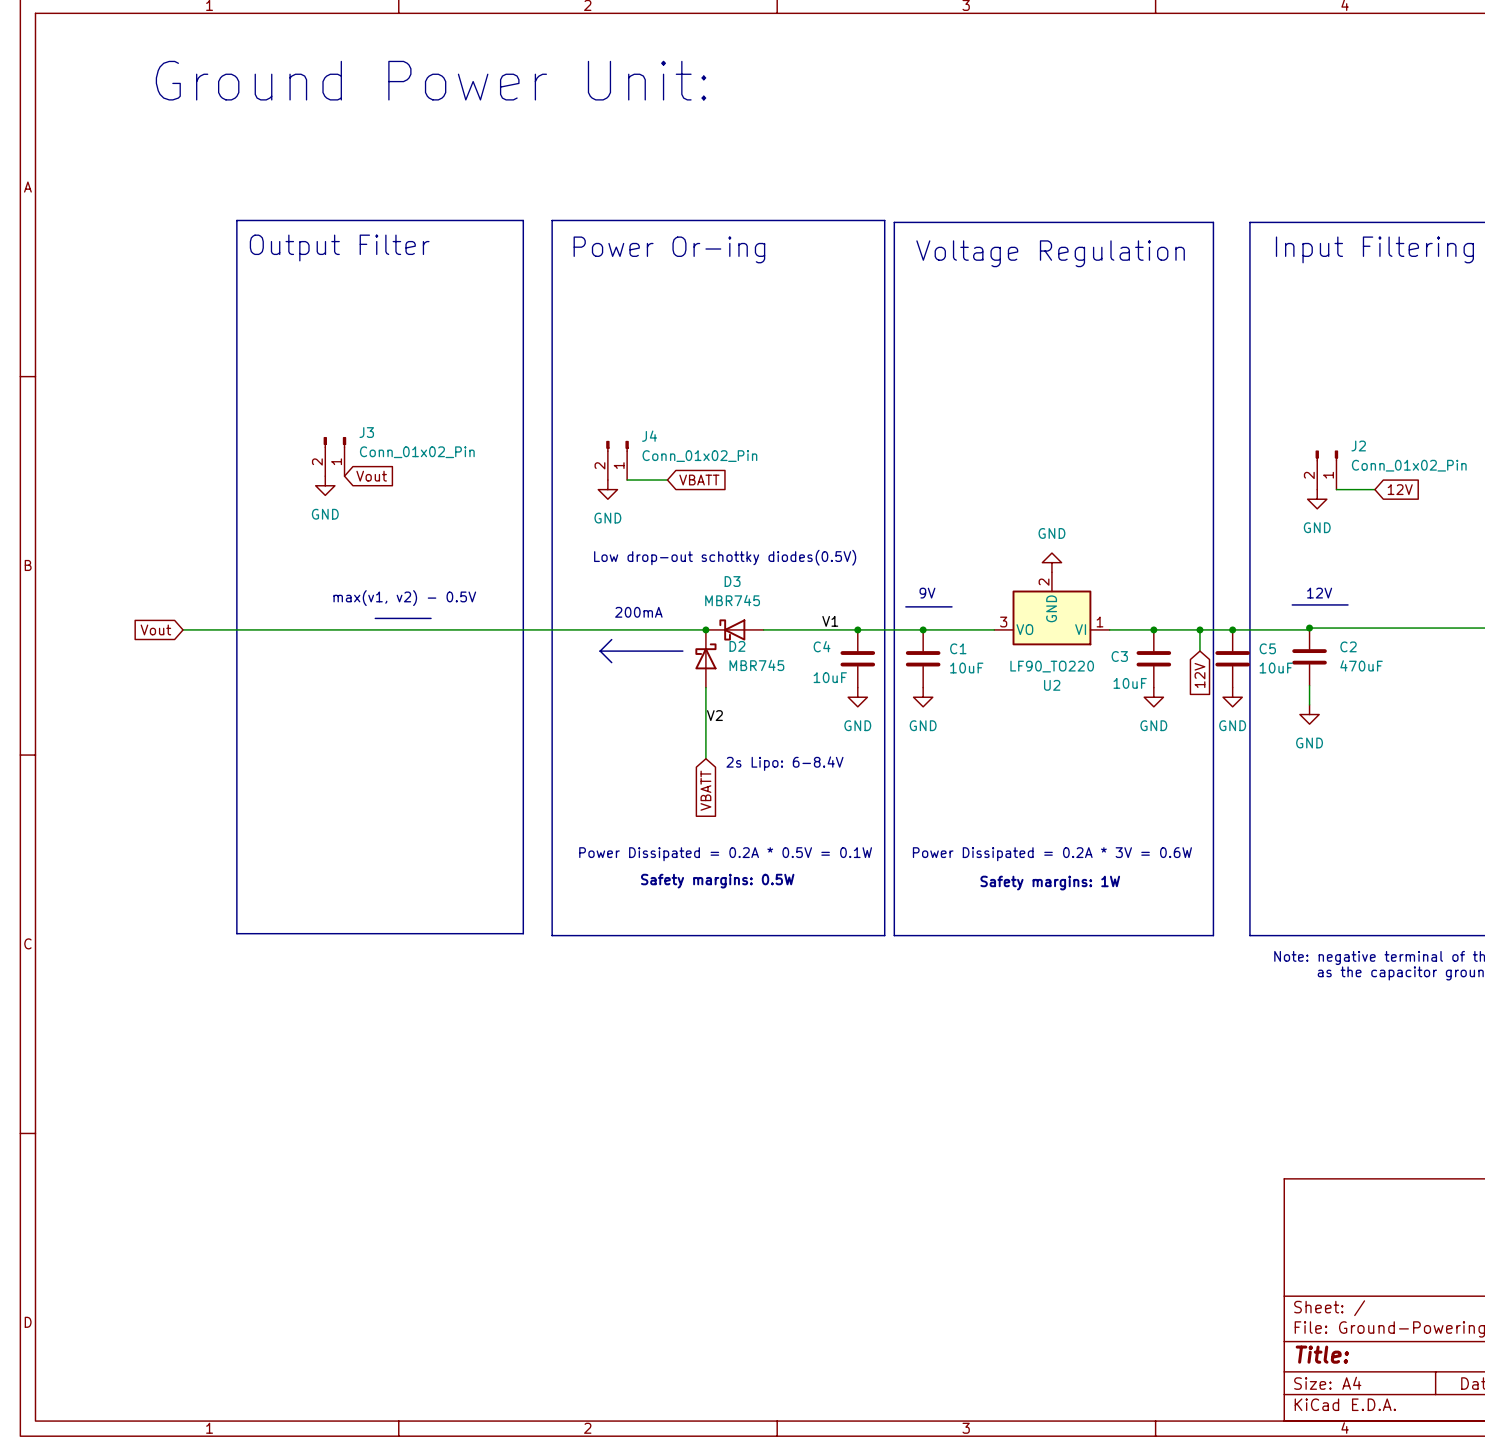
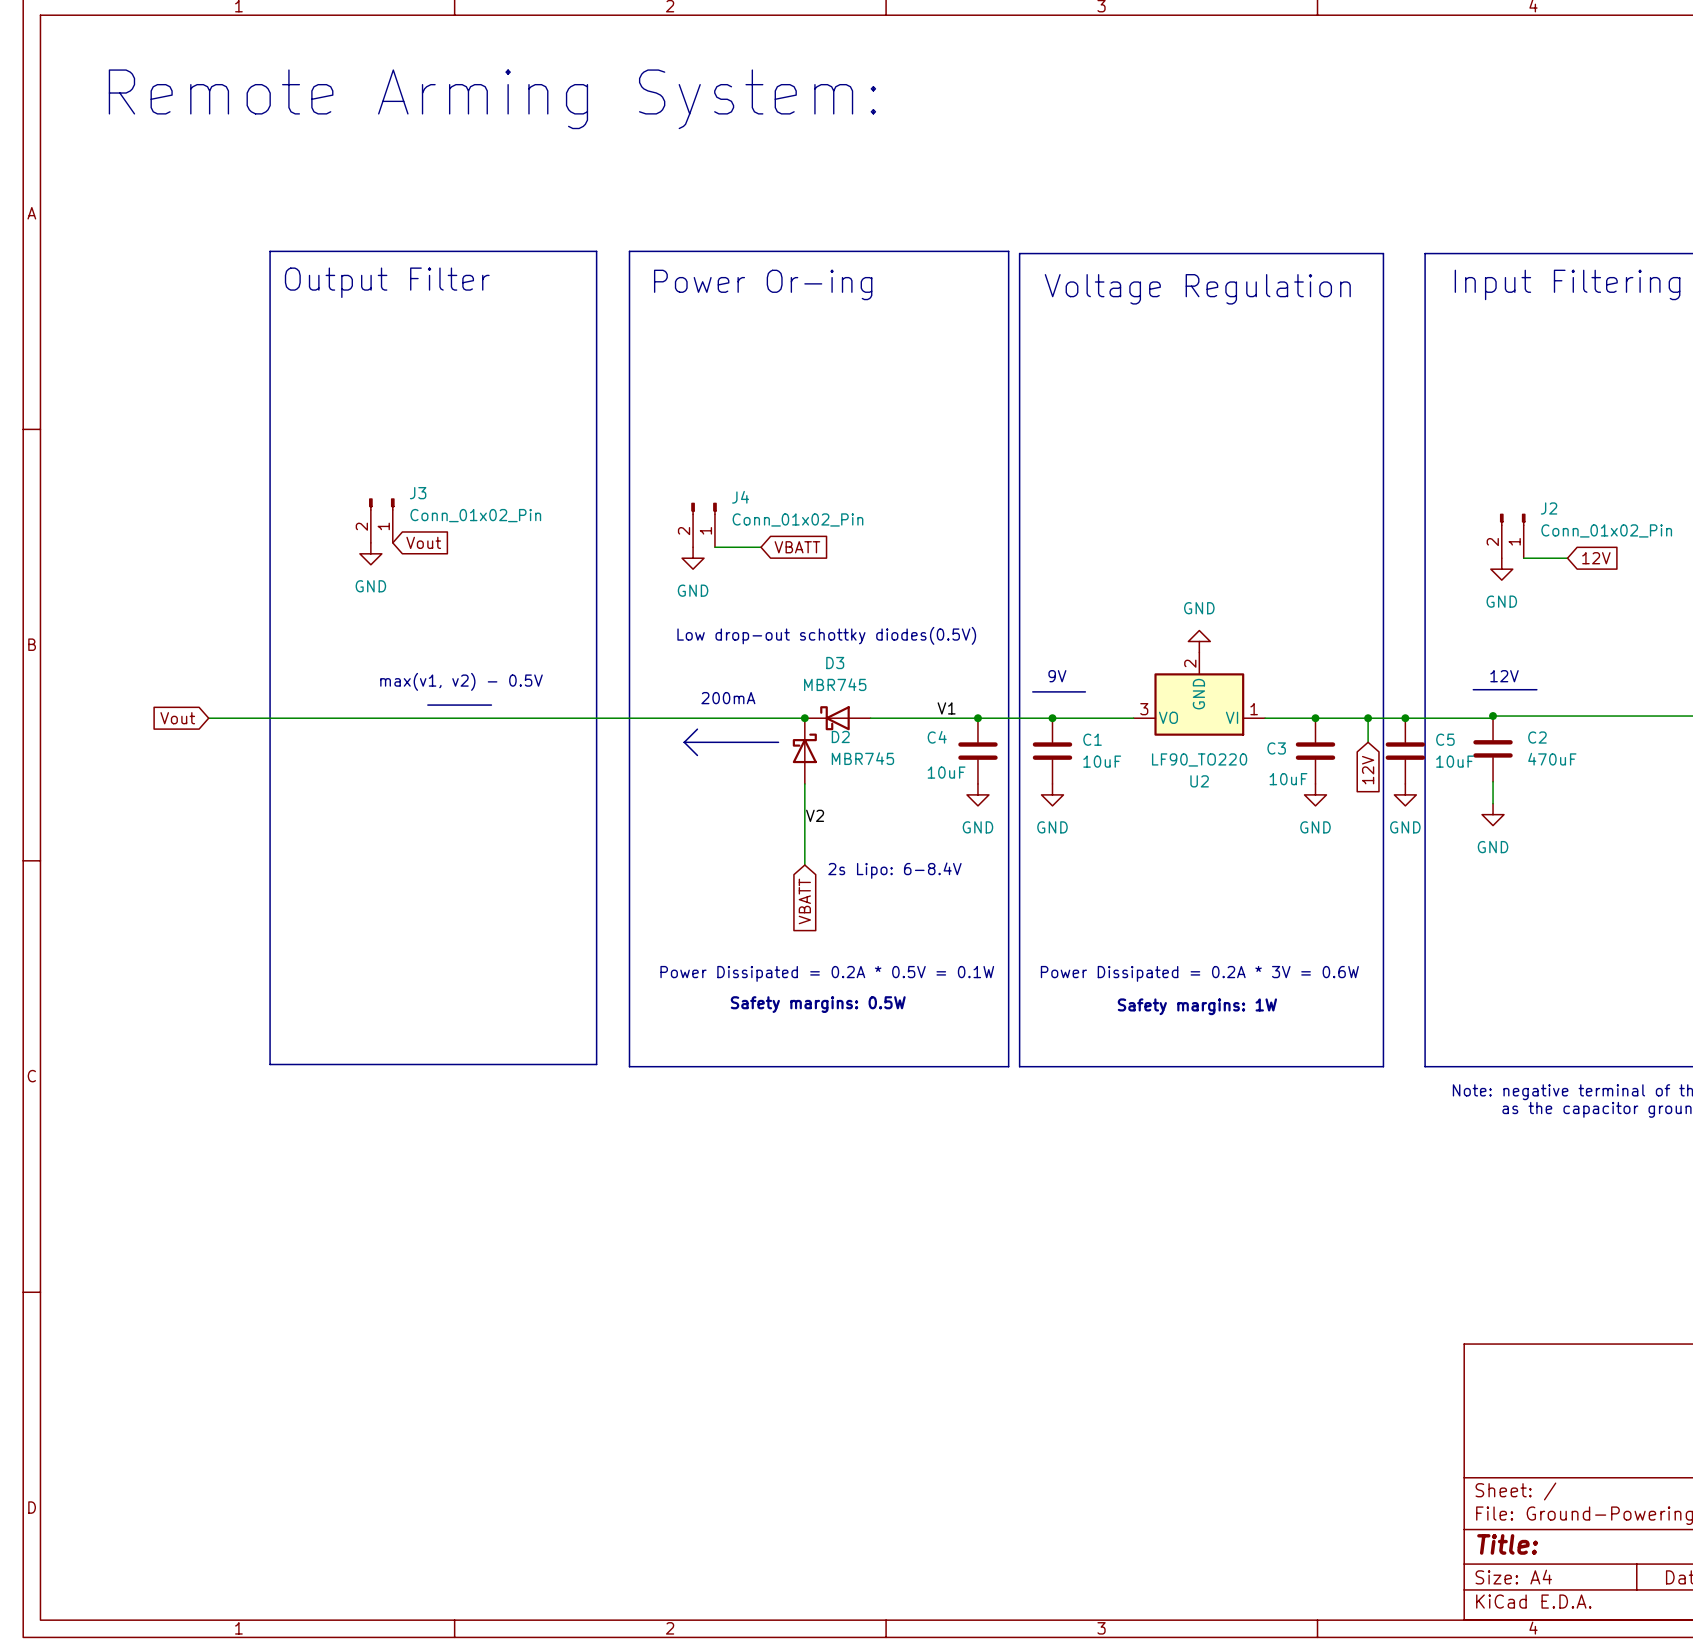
text: Ground Power Unit: (431, 80) -> Remote Arming System: (492, 99)

